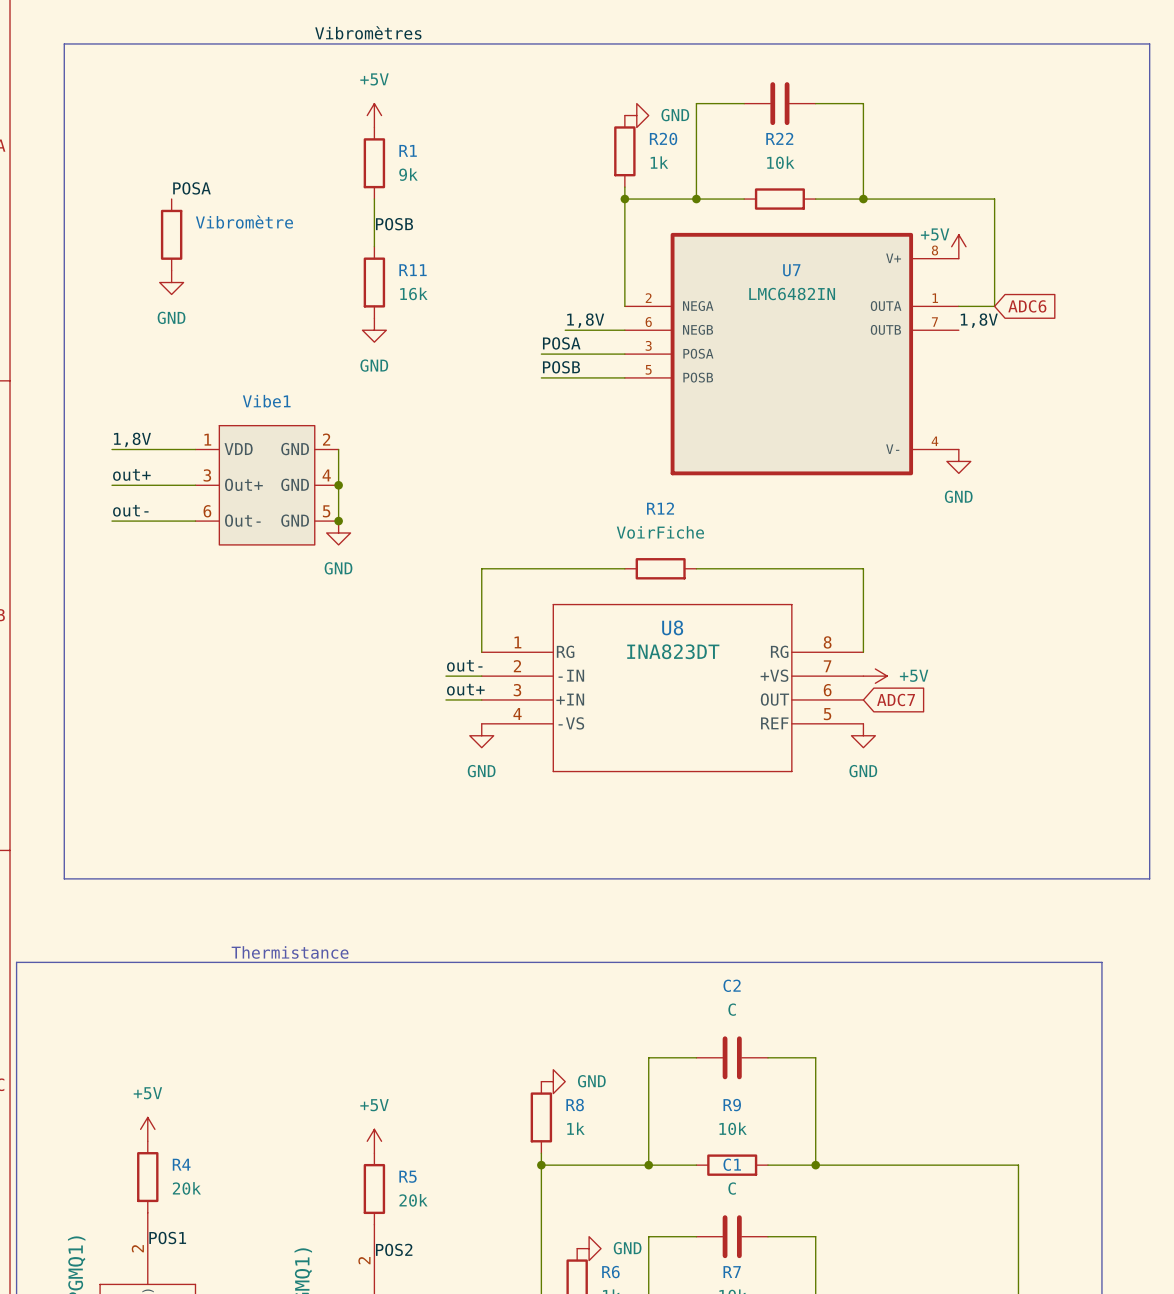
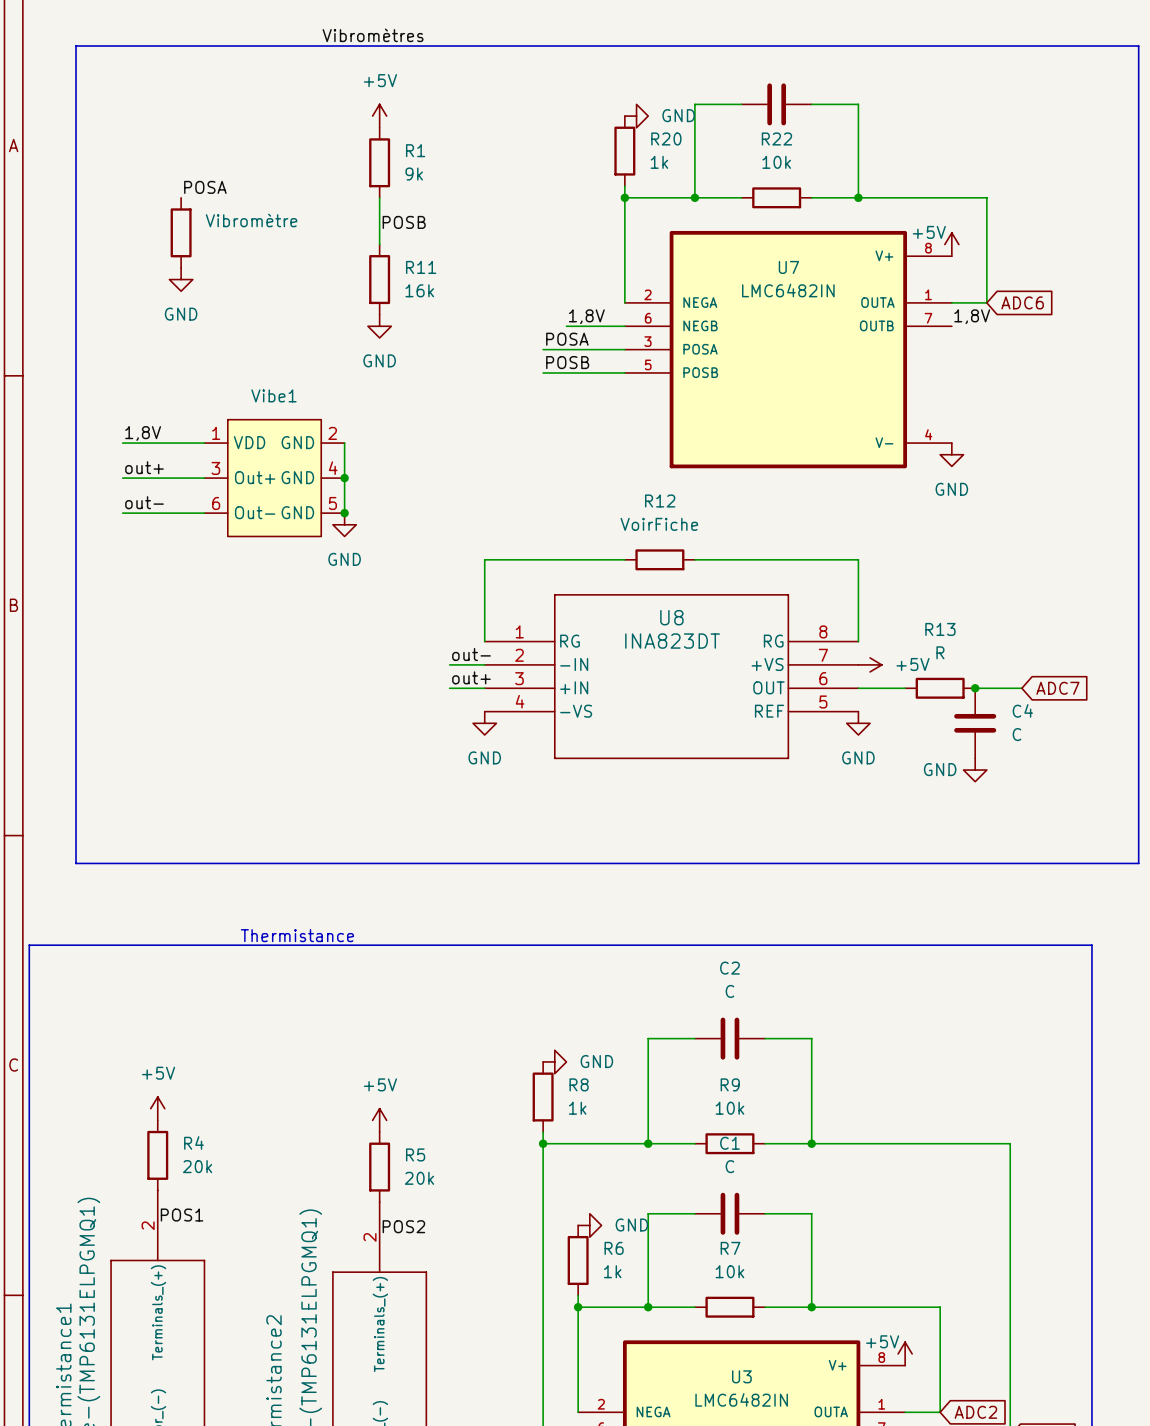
wire: none -> (858, 688) (905, 688)
global label position: ADC7 (896, 699) -> ADC7 (1057, 688)
R13: none -> R (940, 688)
wire: none -> (975, 688) (1021, 688)
junction: none -> (975, 688)
C4: none -> C (975, 723)
power symbol: none -> GND (975, 770)

